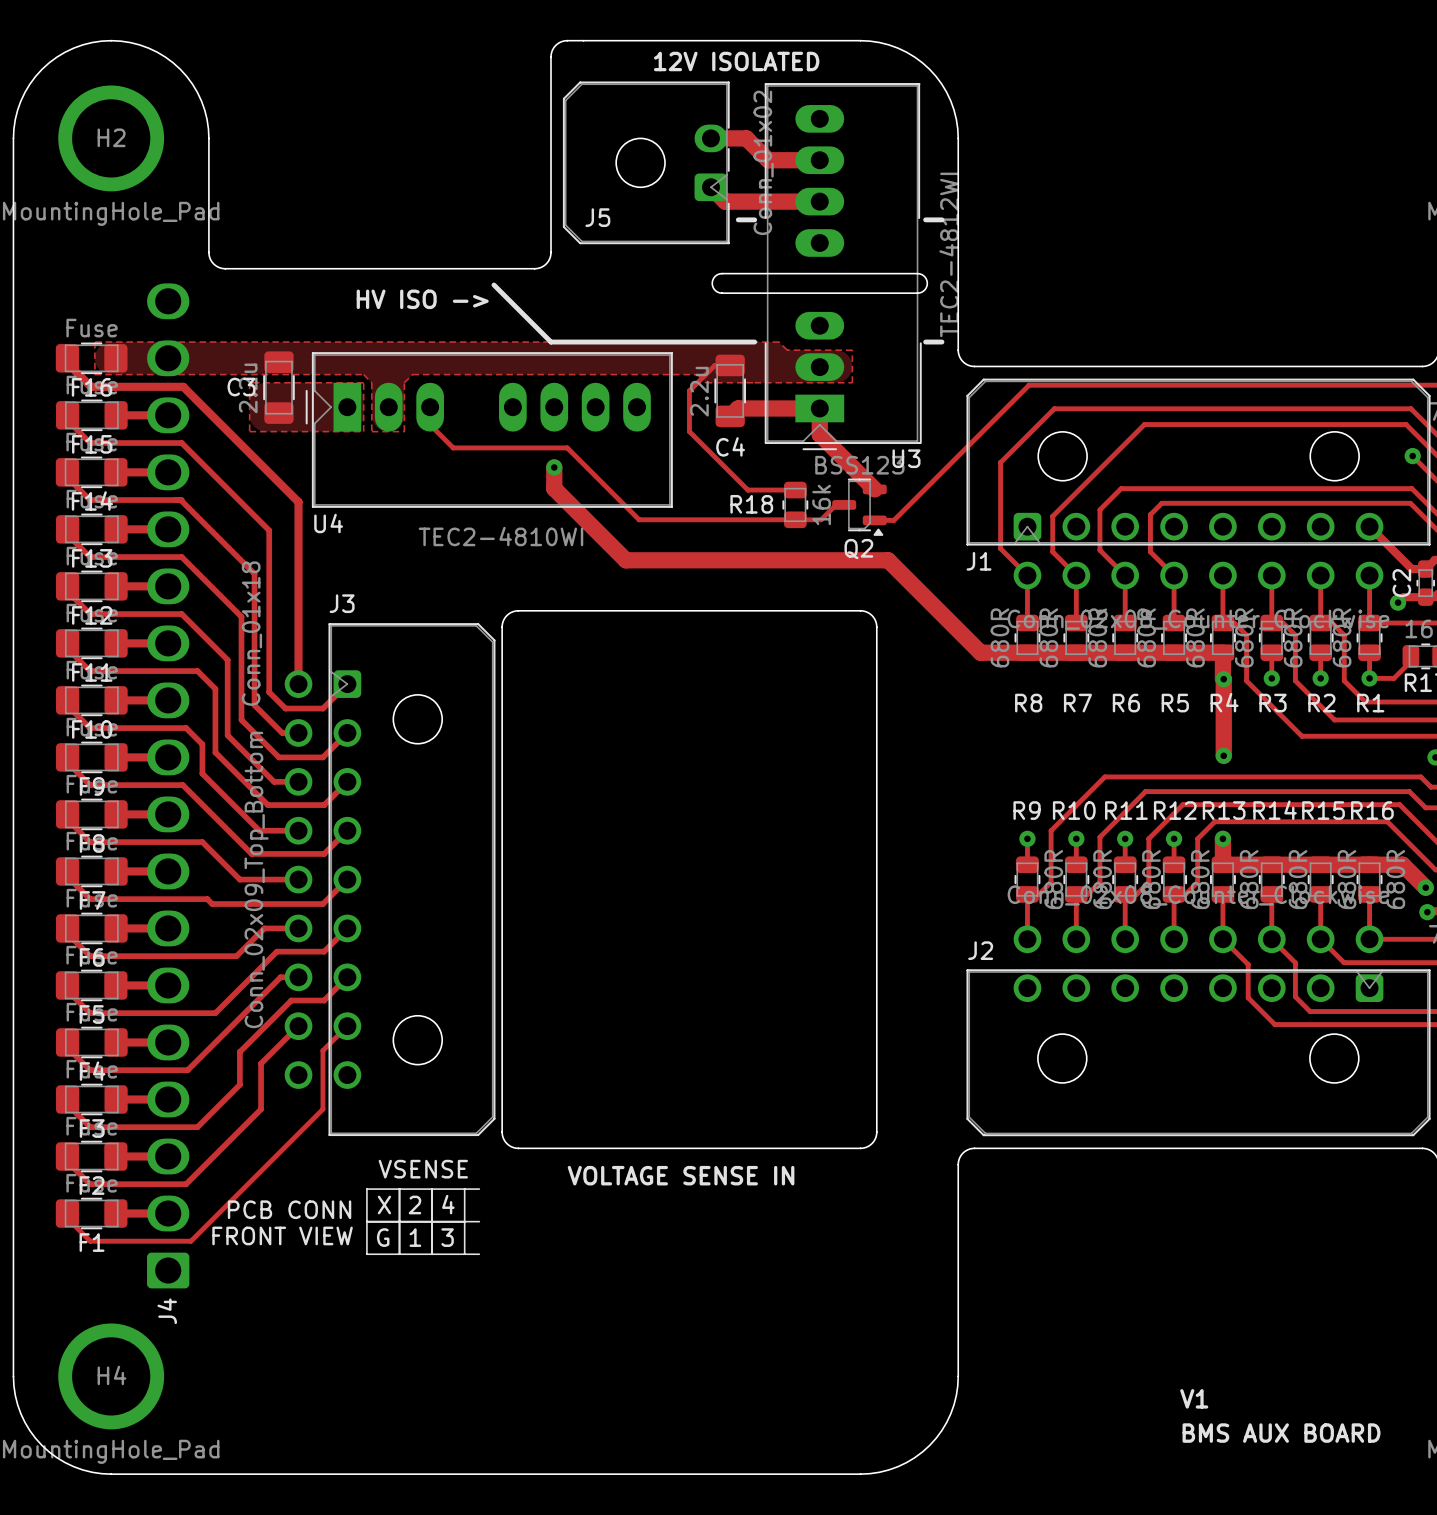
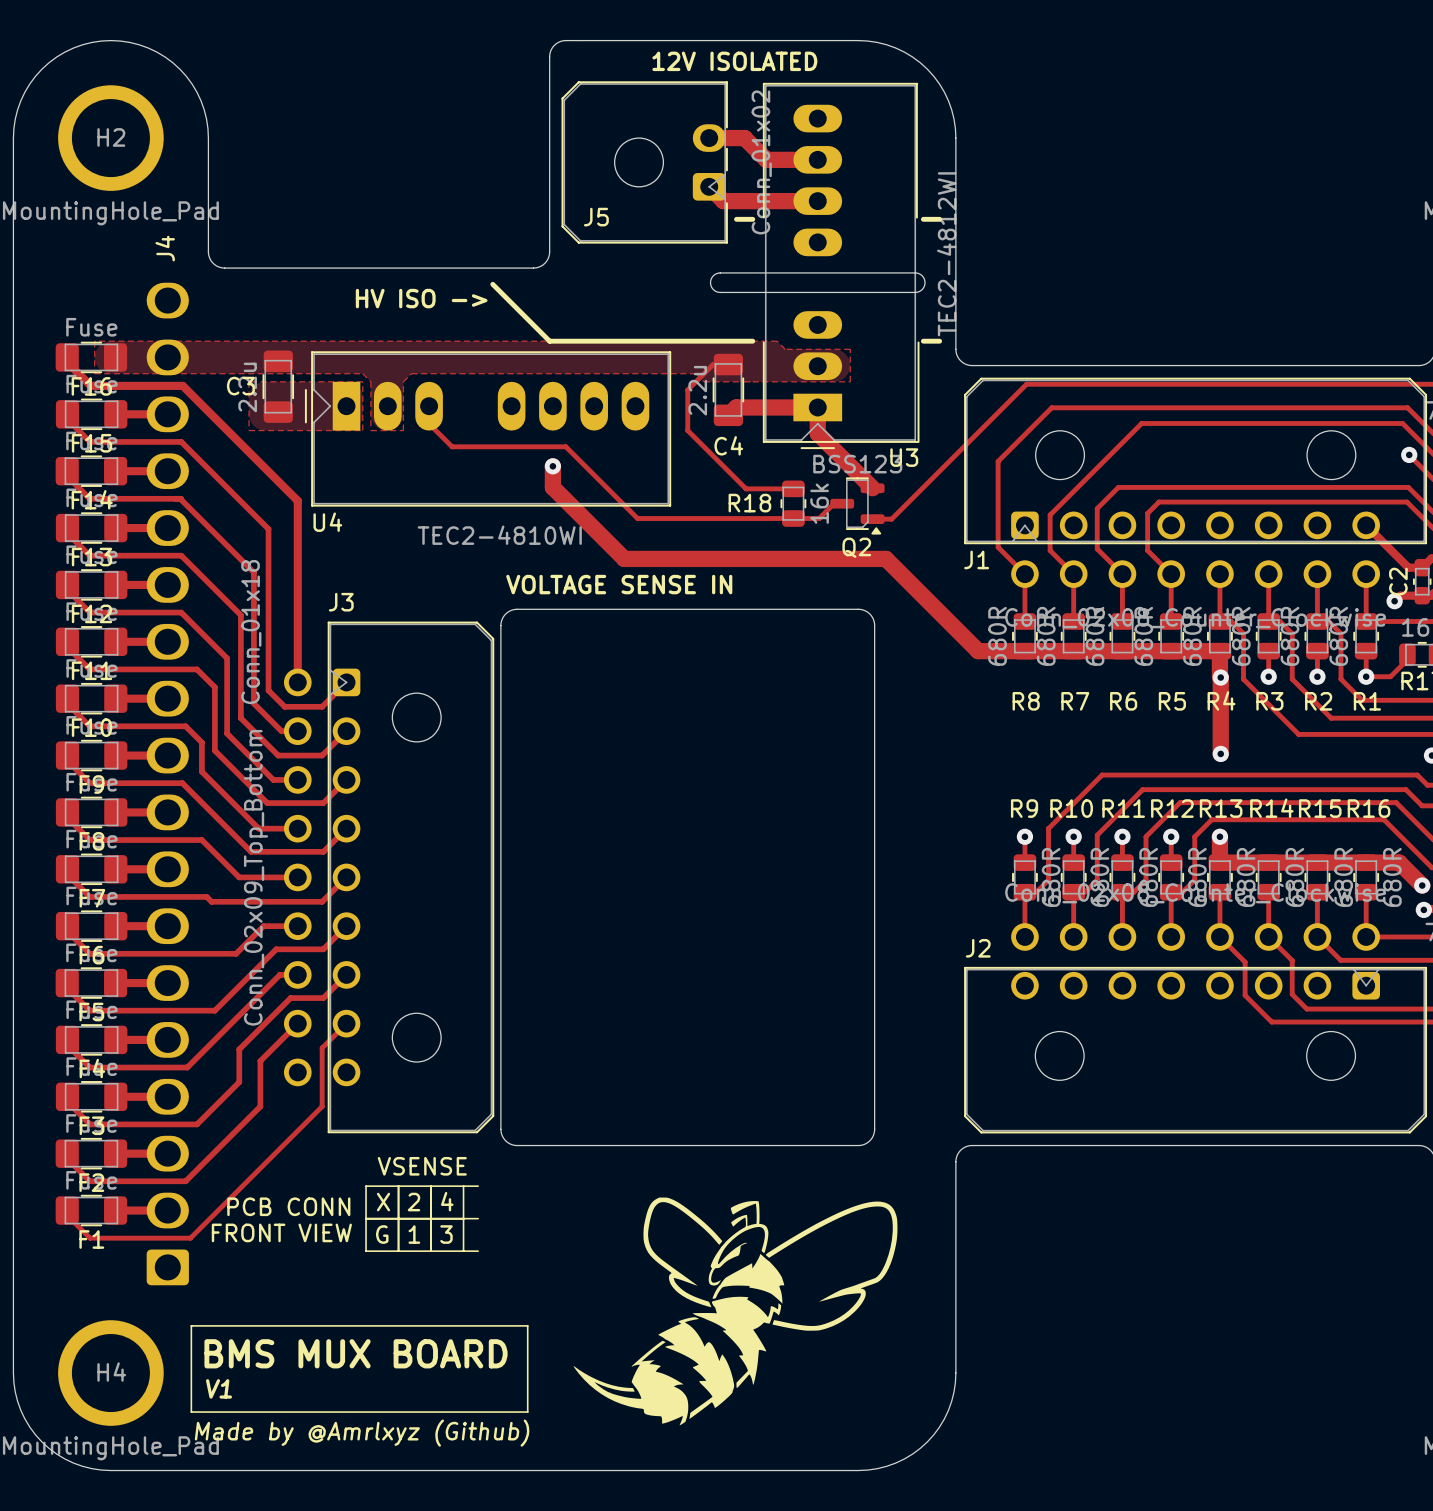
text: none -> VOLTAGE SENSE IN (619, 584)
text: VOLTAGE SENSE IN (681, 1175) -> none
drawing: none -> [573, 1197, 898, 1426]
J4 name position: J4 (167, 1311) -> J4 (165, 248)
line: none -> (191, 1325) (527, 1325) (527, 1412) (191, 1412) (191, 1325)
text: none -> BMS MUX BOARD (356, 1353)
text: none -> V1 (218, 1388)
text: V1 (1194, 1398) -> none
text: BMS AUX BOARD (1281, 1433) -> none
text: none -> Made by @Amrlxyz (Github) (362, 1433)

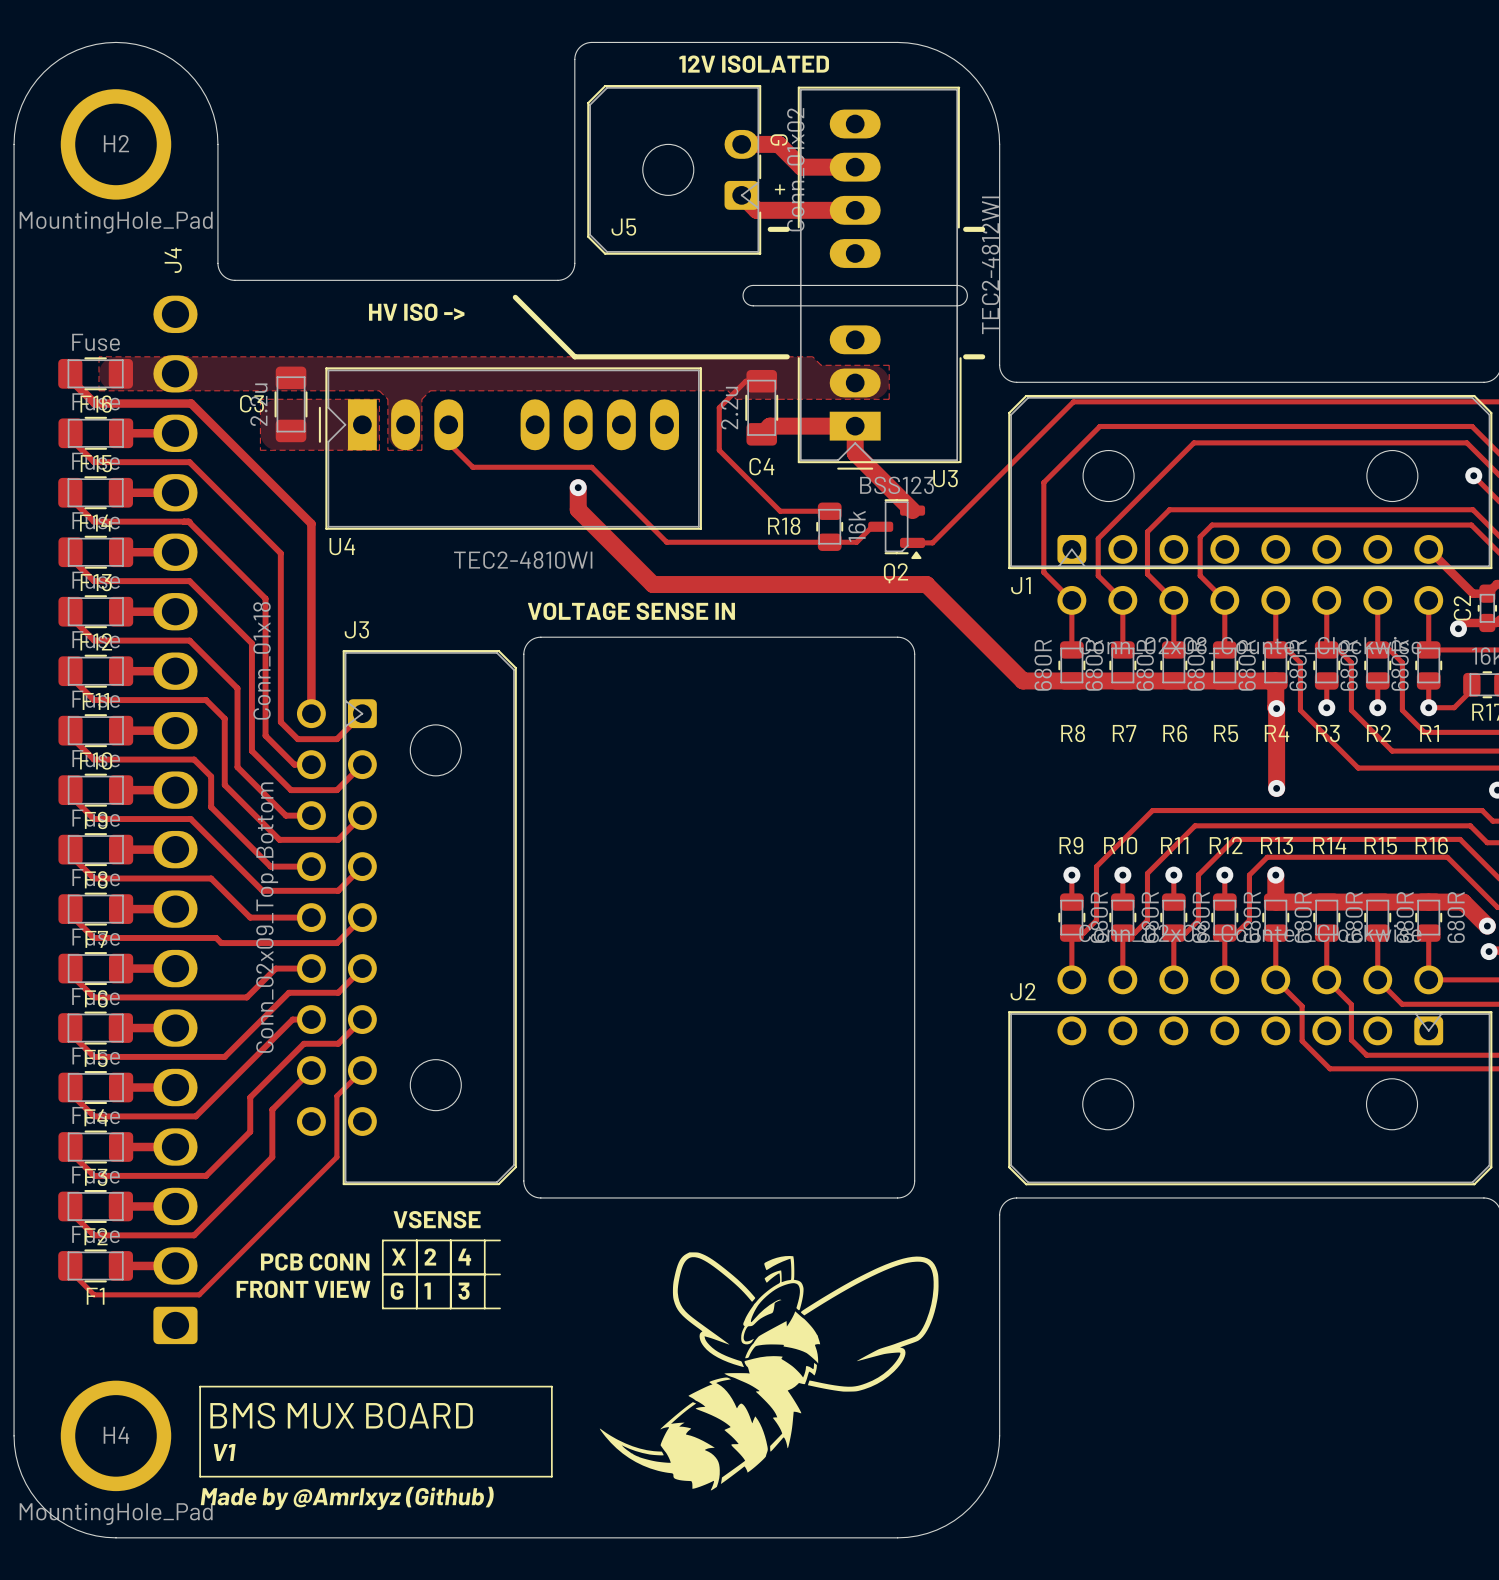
text: none -> G (779, 139)
text: none -> + (780, 189)

